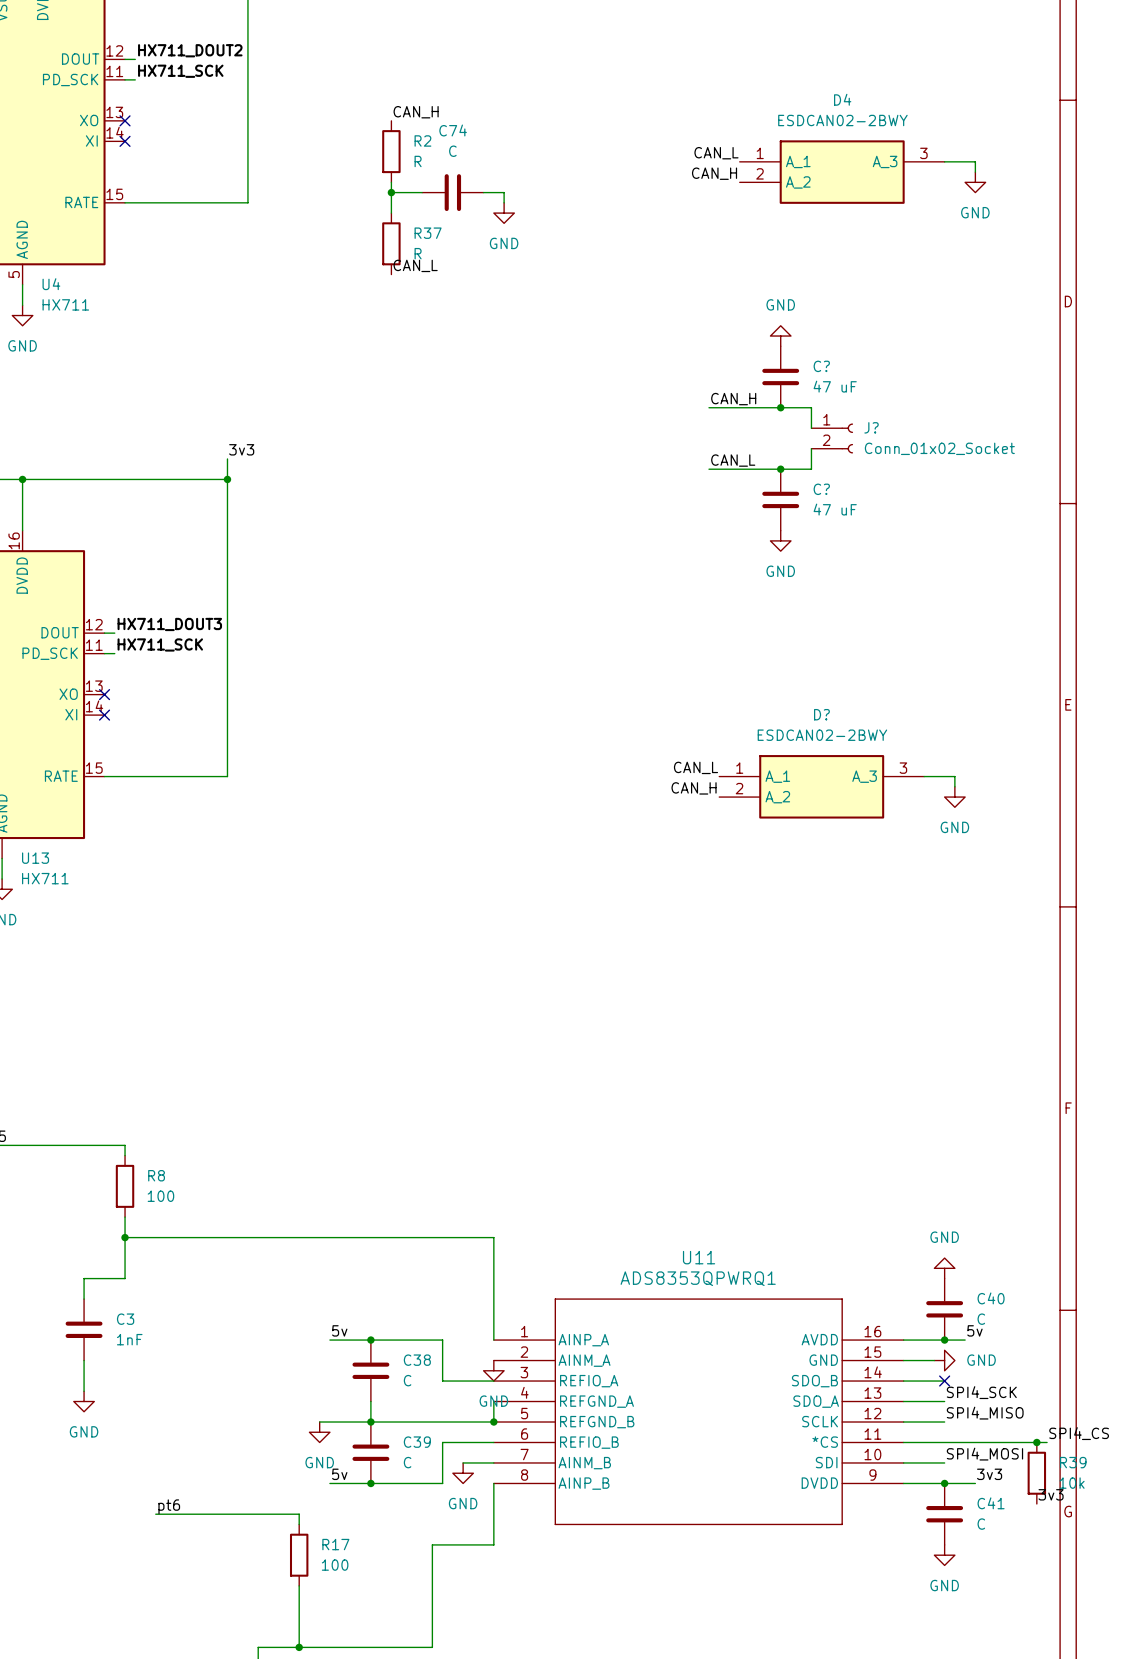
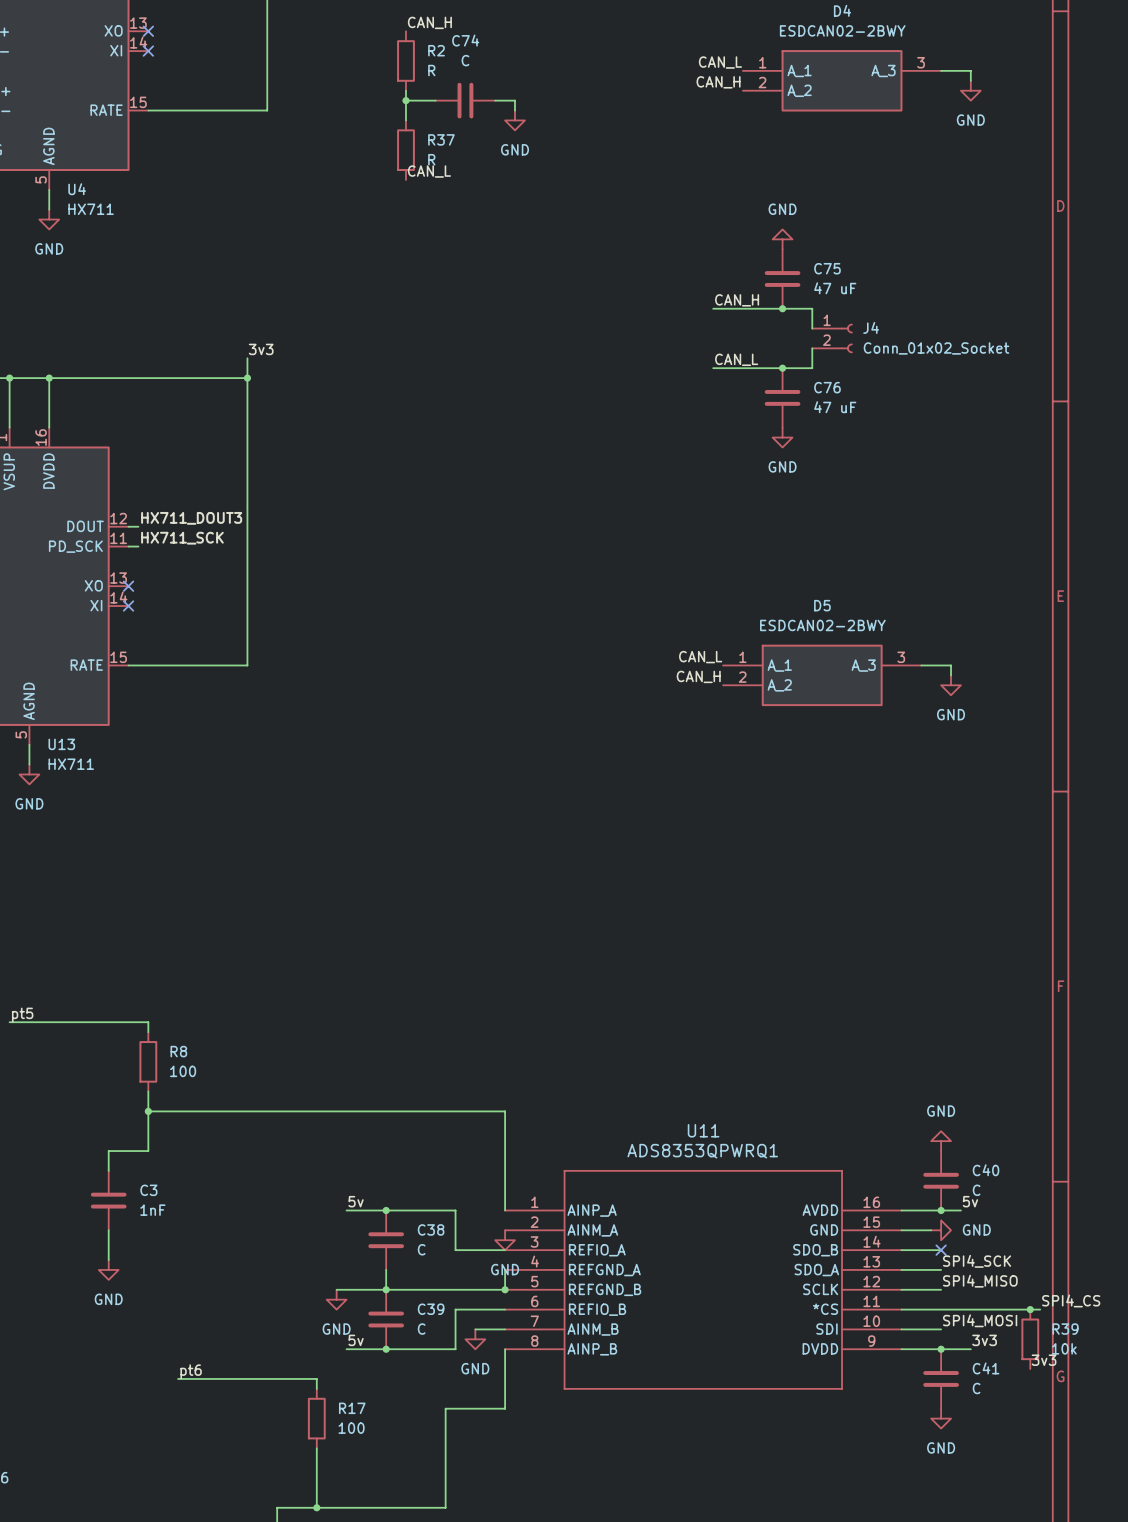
C? name: C? (821, 366) -> C75 (827, 268)
J? name: J? (871, 427) -> J4 (871, 327)
C? name: C? (821, 489) -> C76 (827, 387)
D? name: D? (821, 714) -> D5 (822, 605)

